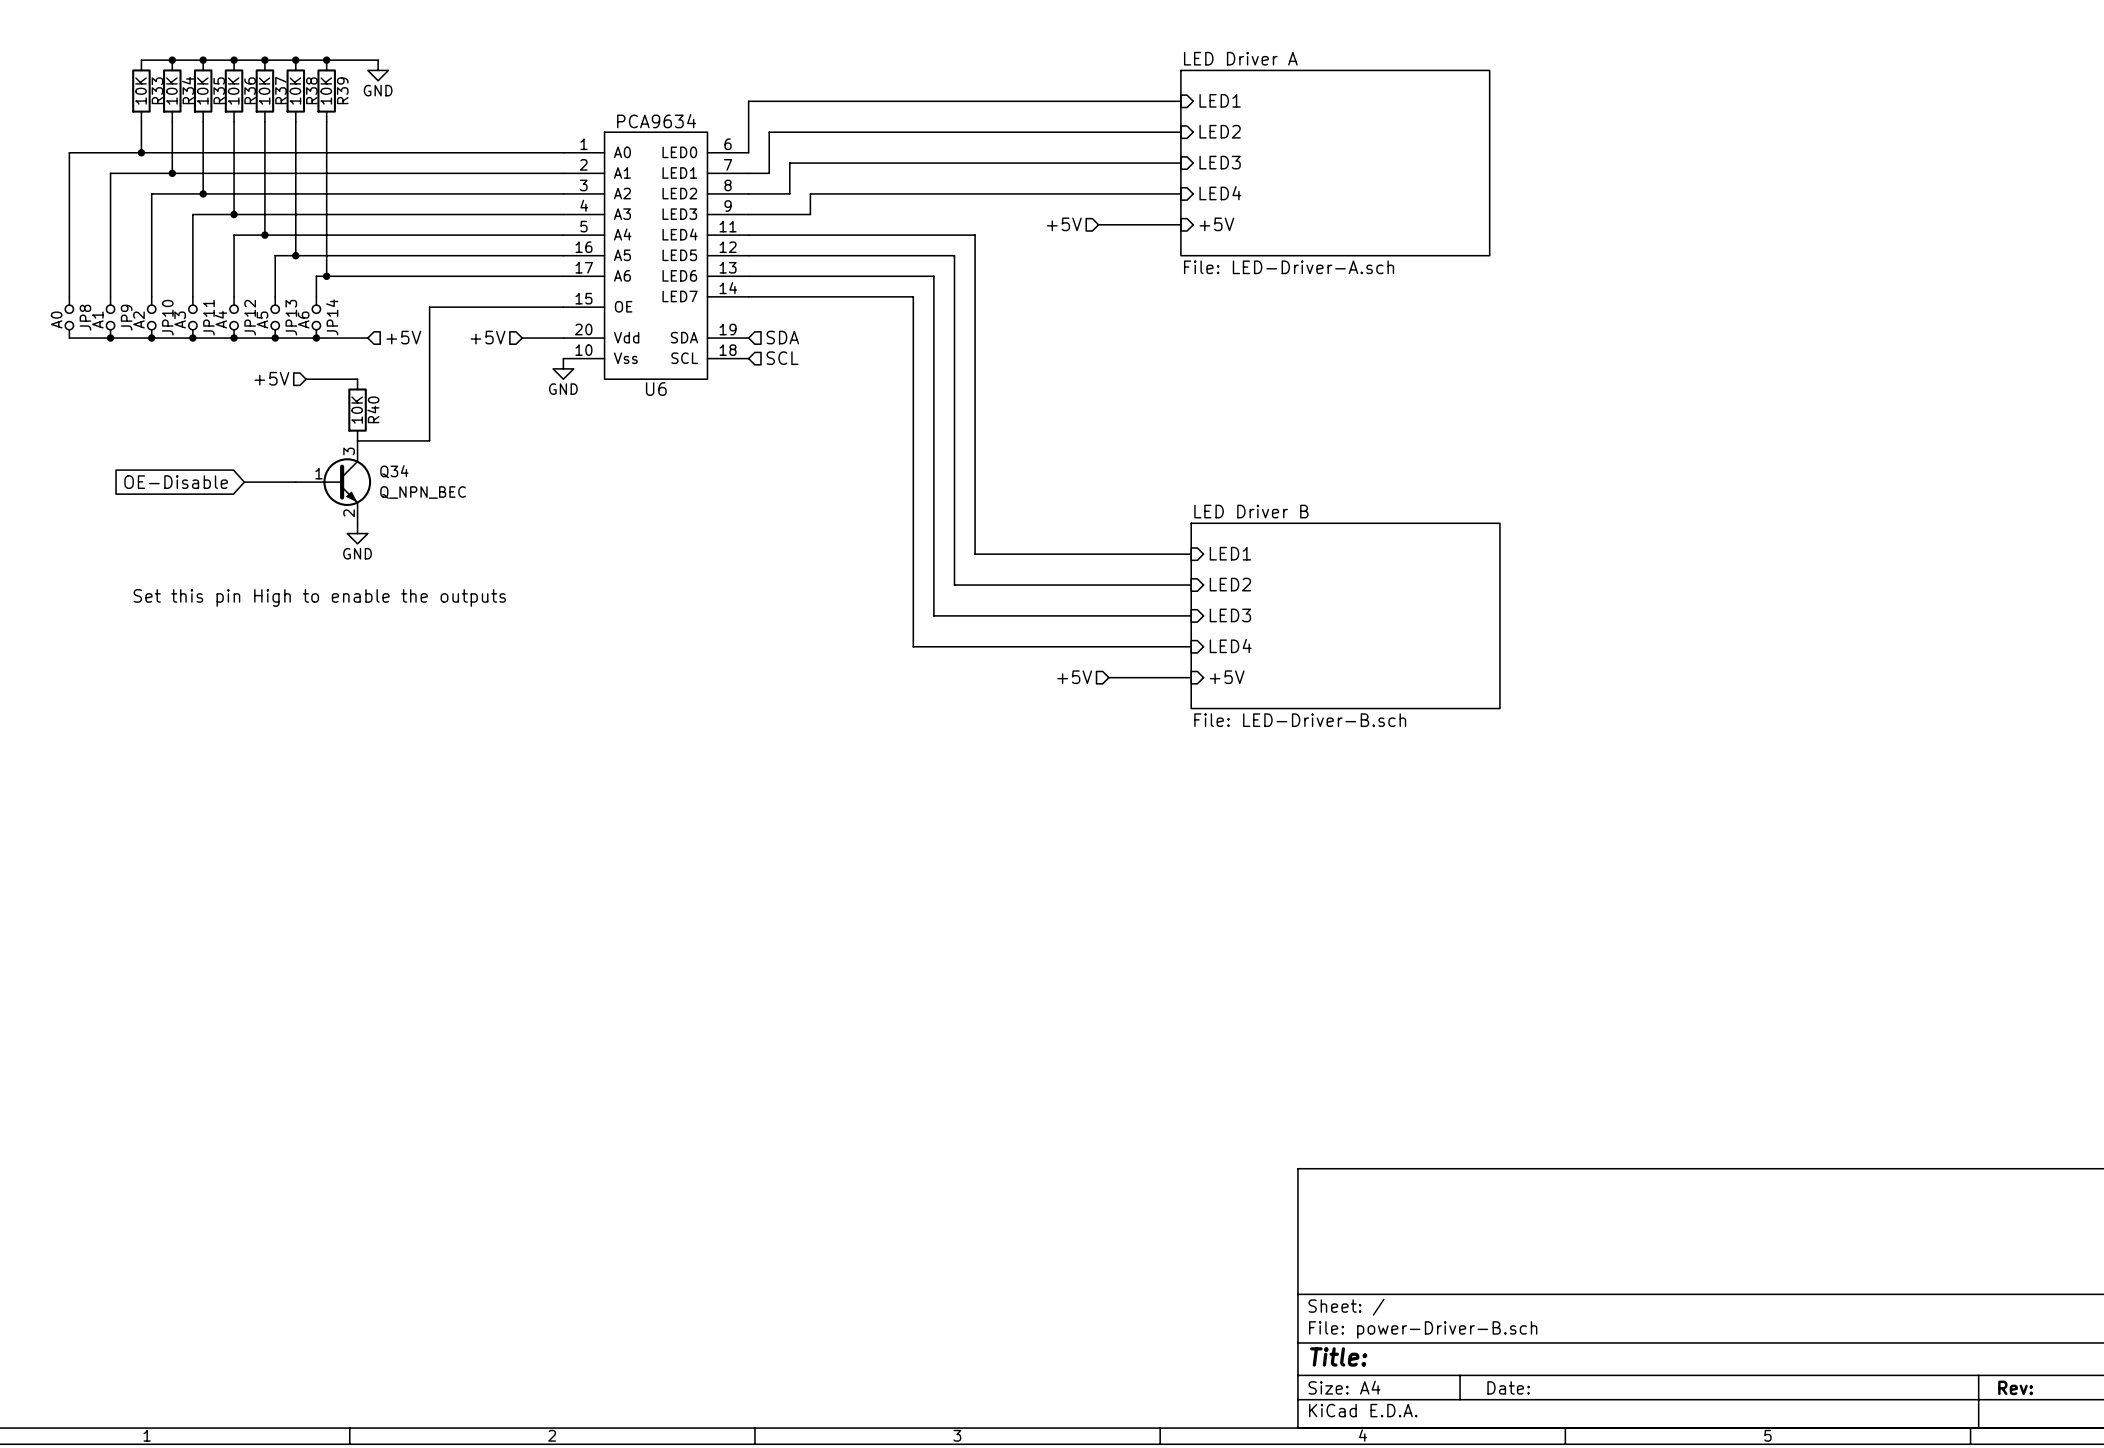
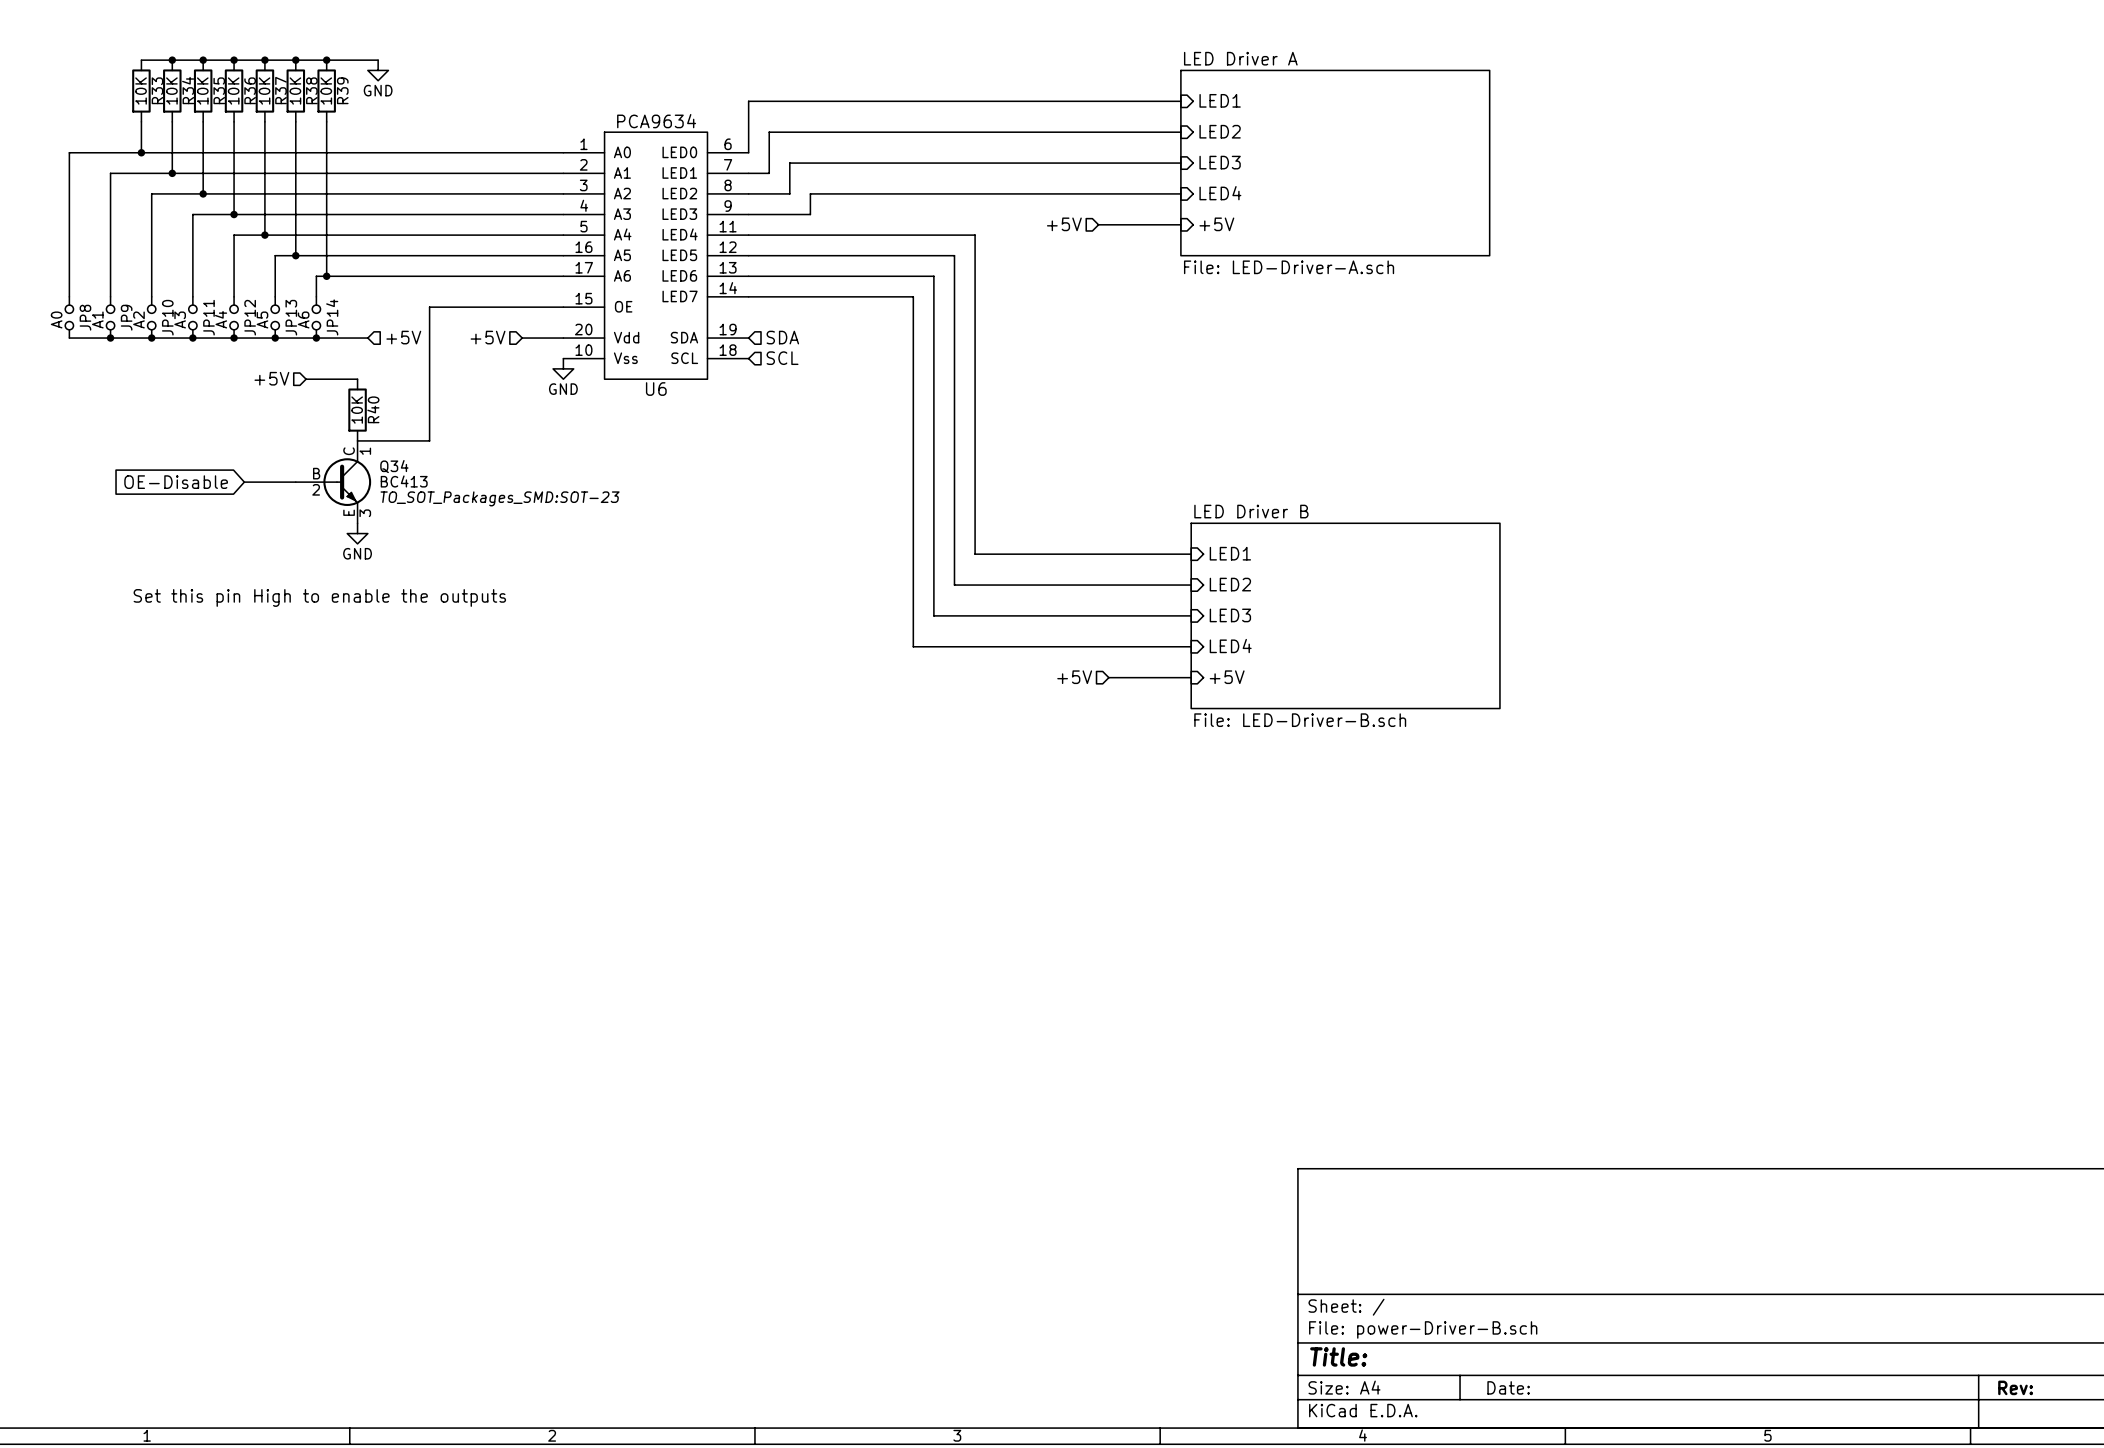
Q34 symbol: [295, 440, 372, 524] -> [295, 440, 372, 524]
Q34 value: Q_NPN_BEC (423, 492) -> BC413 (404, 481)
Q34 text: none -> TO_SOT_Packages_SMD:SOT-23 (500, 498)

